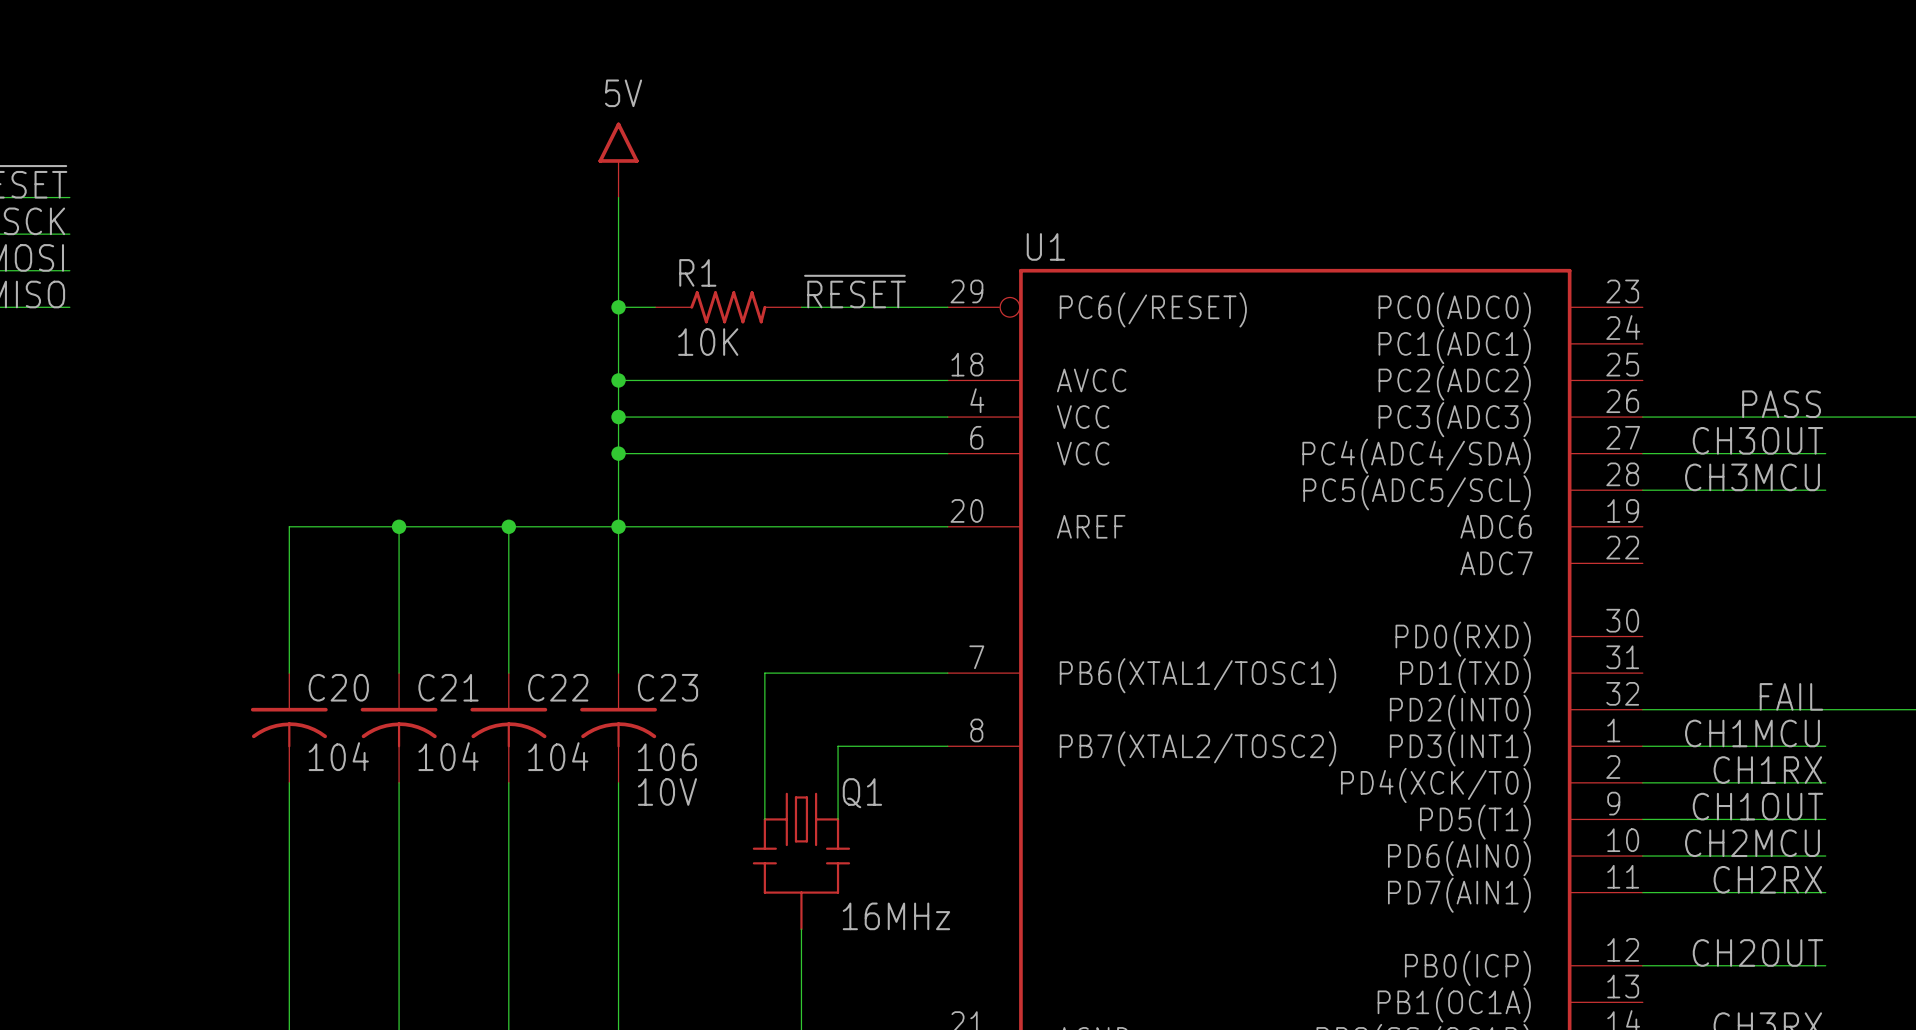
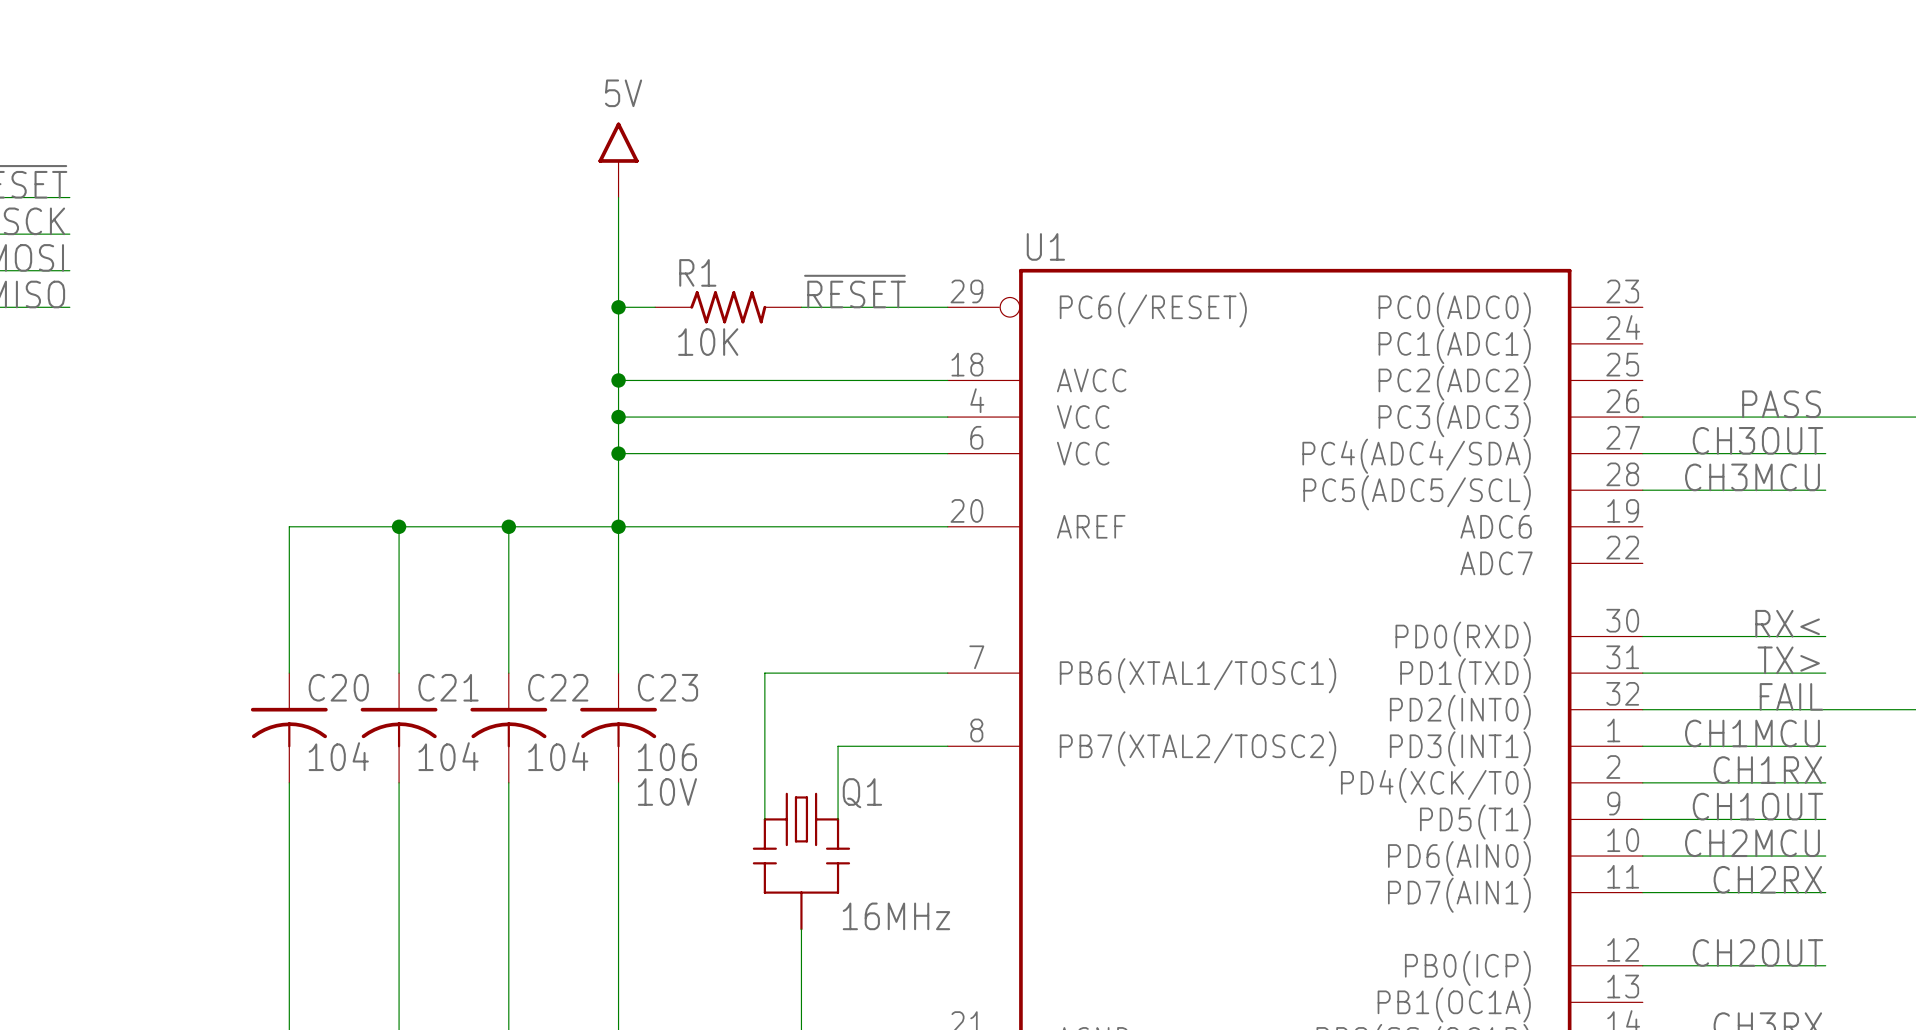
label: none -> RX< (1787, 623)
wire: none -> (1642, 636) (1825, 636)
label: none -> TX> (1788, 660)
wire: none -> (1642, 673) (1825, 673)

